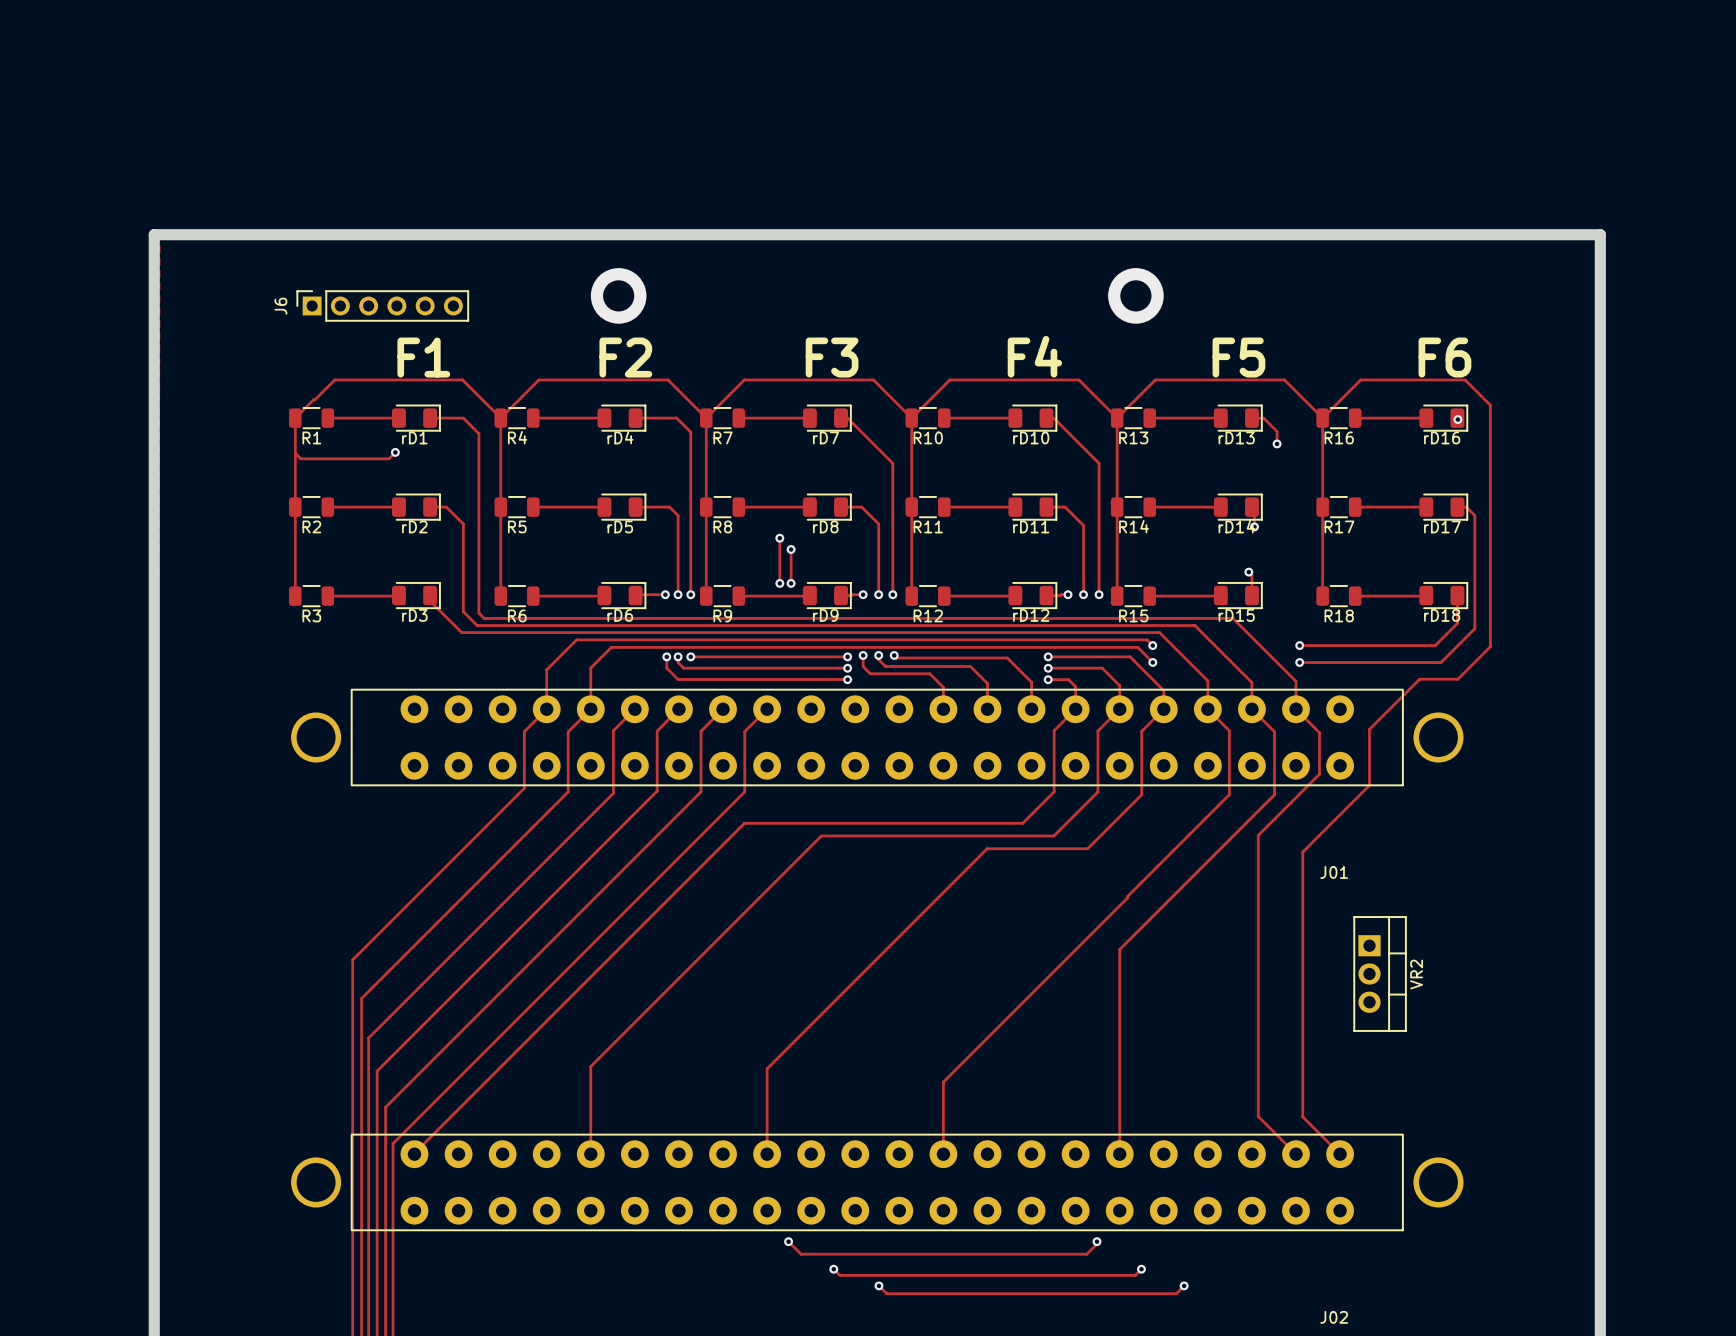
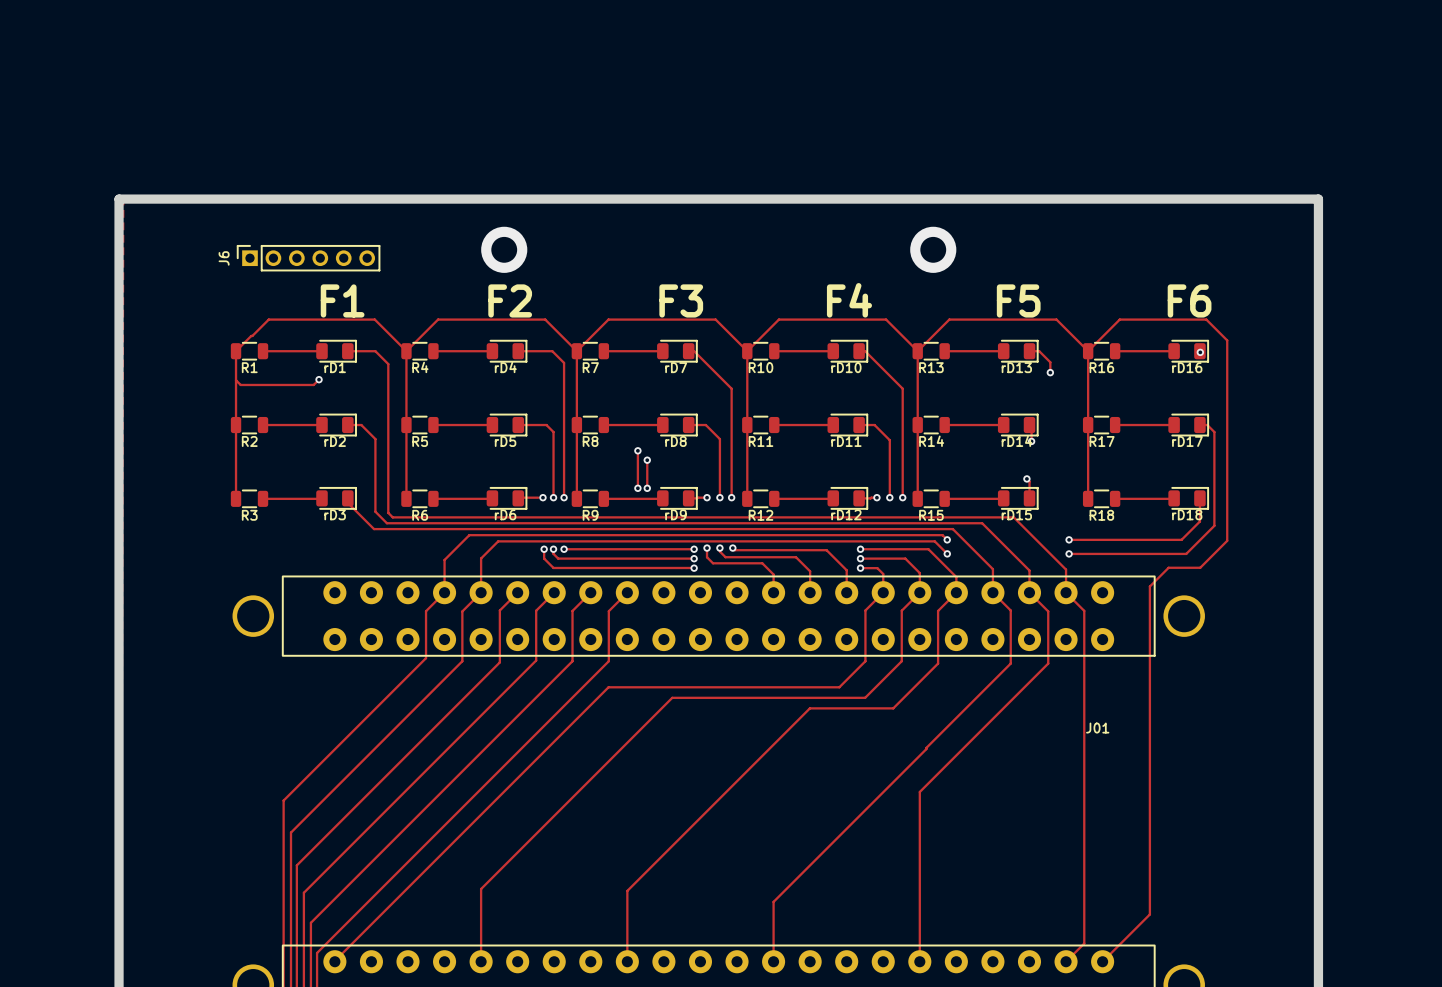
track: (1397, 701) (1369, 729) (1369, 785) (1302, 852) (1302, 1116) (1340, 1154) -> (1149, 586) (1149, 914) (1102, 961)
track: (1317, 731) (1319, 774) (1258, 835) (1258, 1116) (1296, 1154) -> (1084, 610) (1084, 943) (1067, 960)
VR2: (1380, 973) -> none

